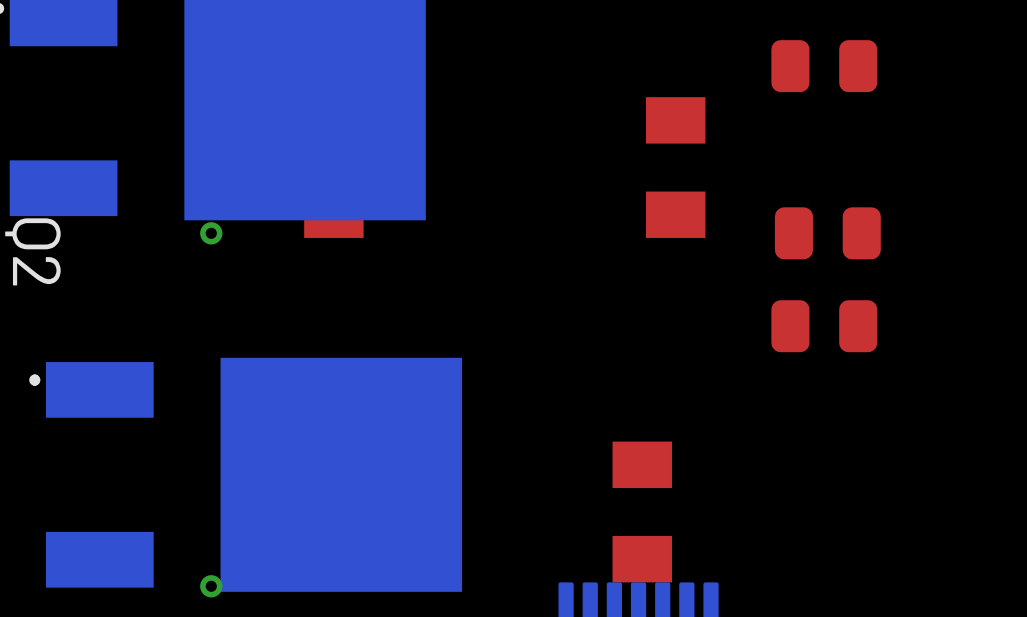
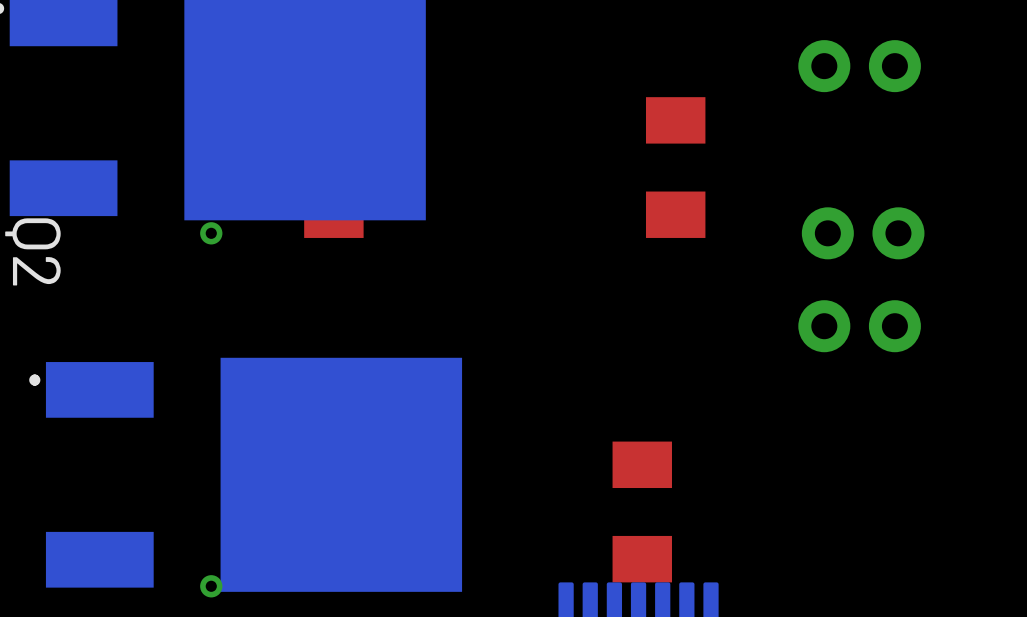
part footprint: [771, 40, 878, 93] -> [798, 40, 921, 93]
part footprint: [774, 207, 881, 260] -> [801, 207, 925, 260]
part footprint: [771, 300, 878, 353] -> [798, 300, 921, 353]

